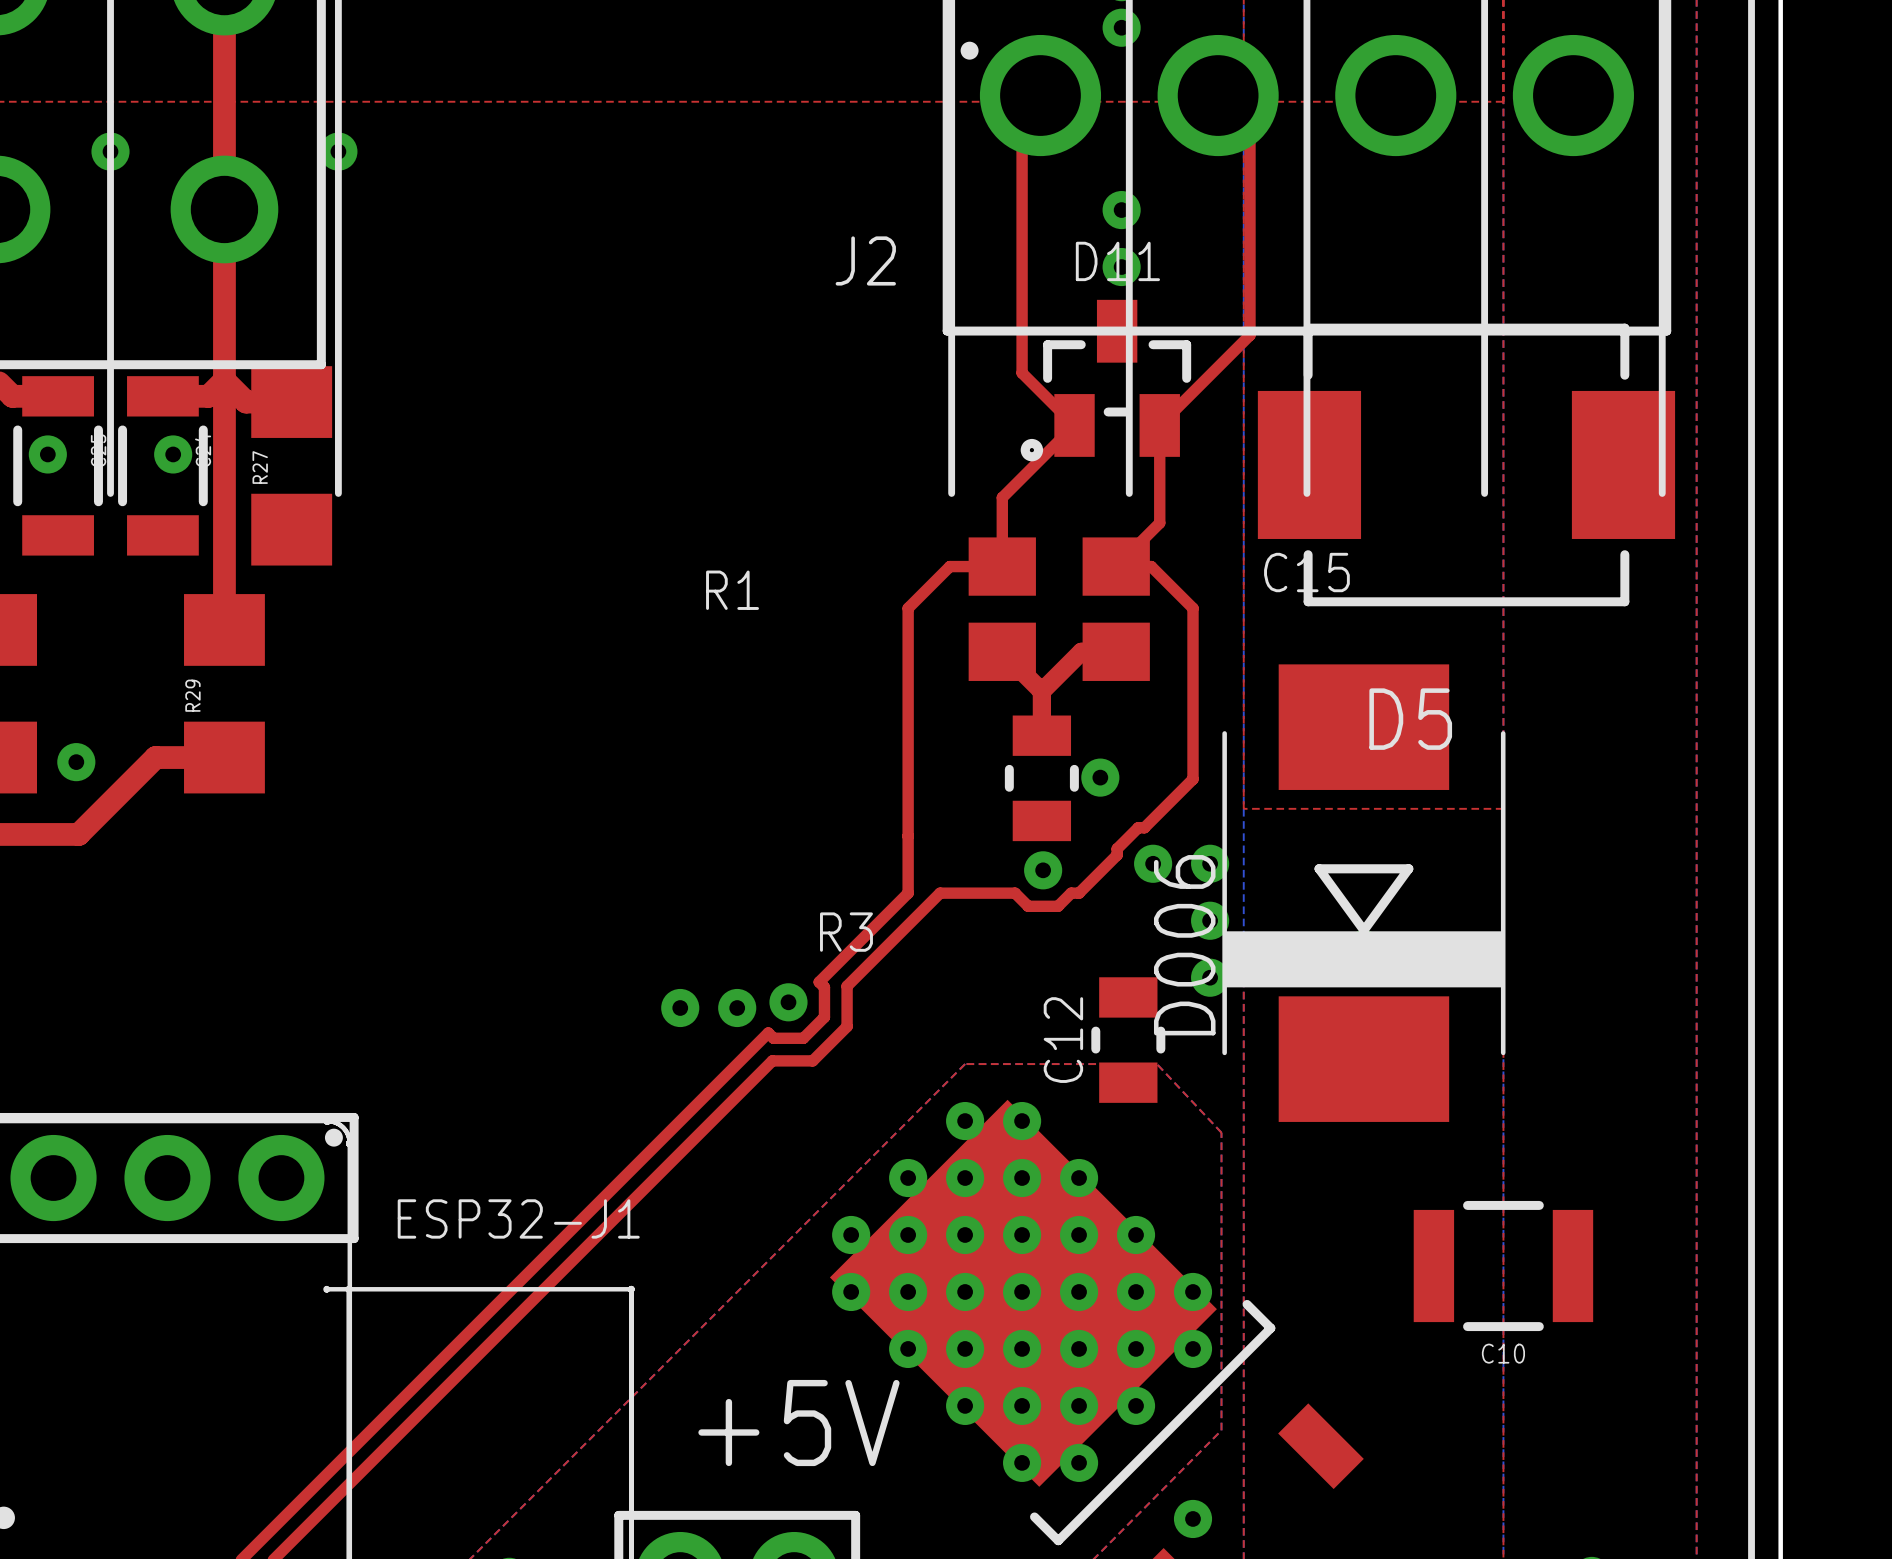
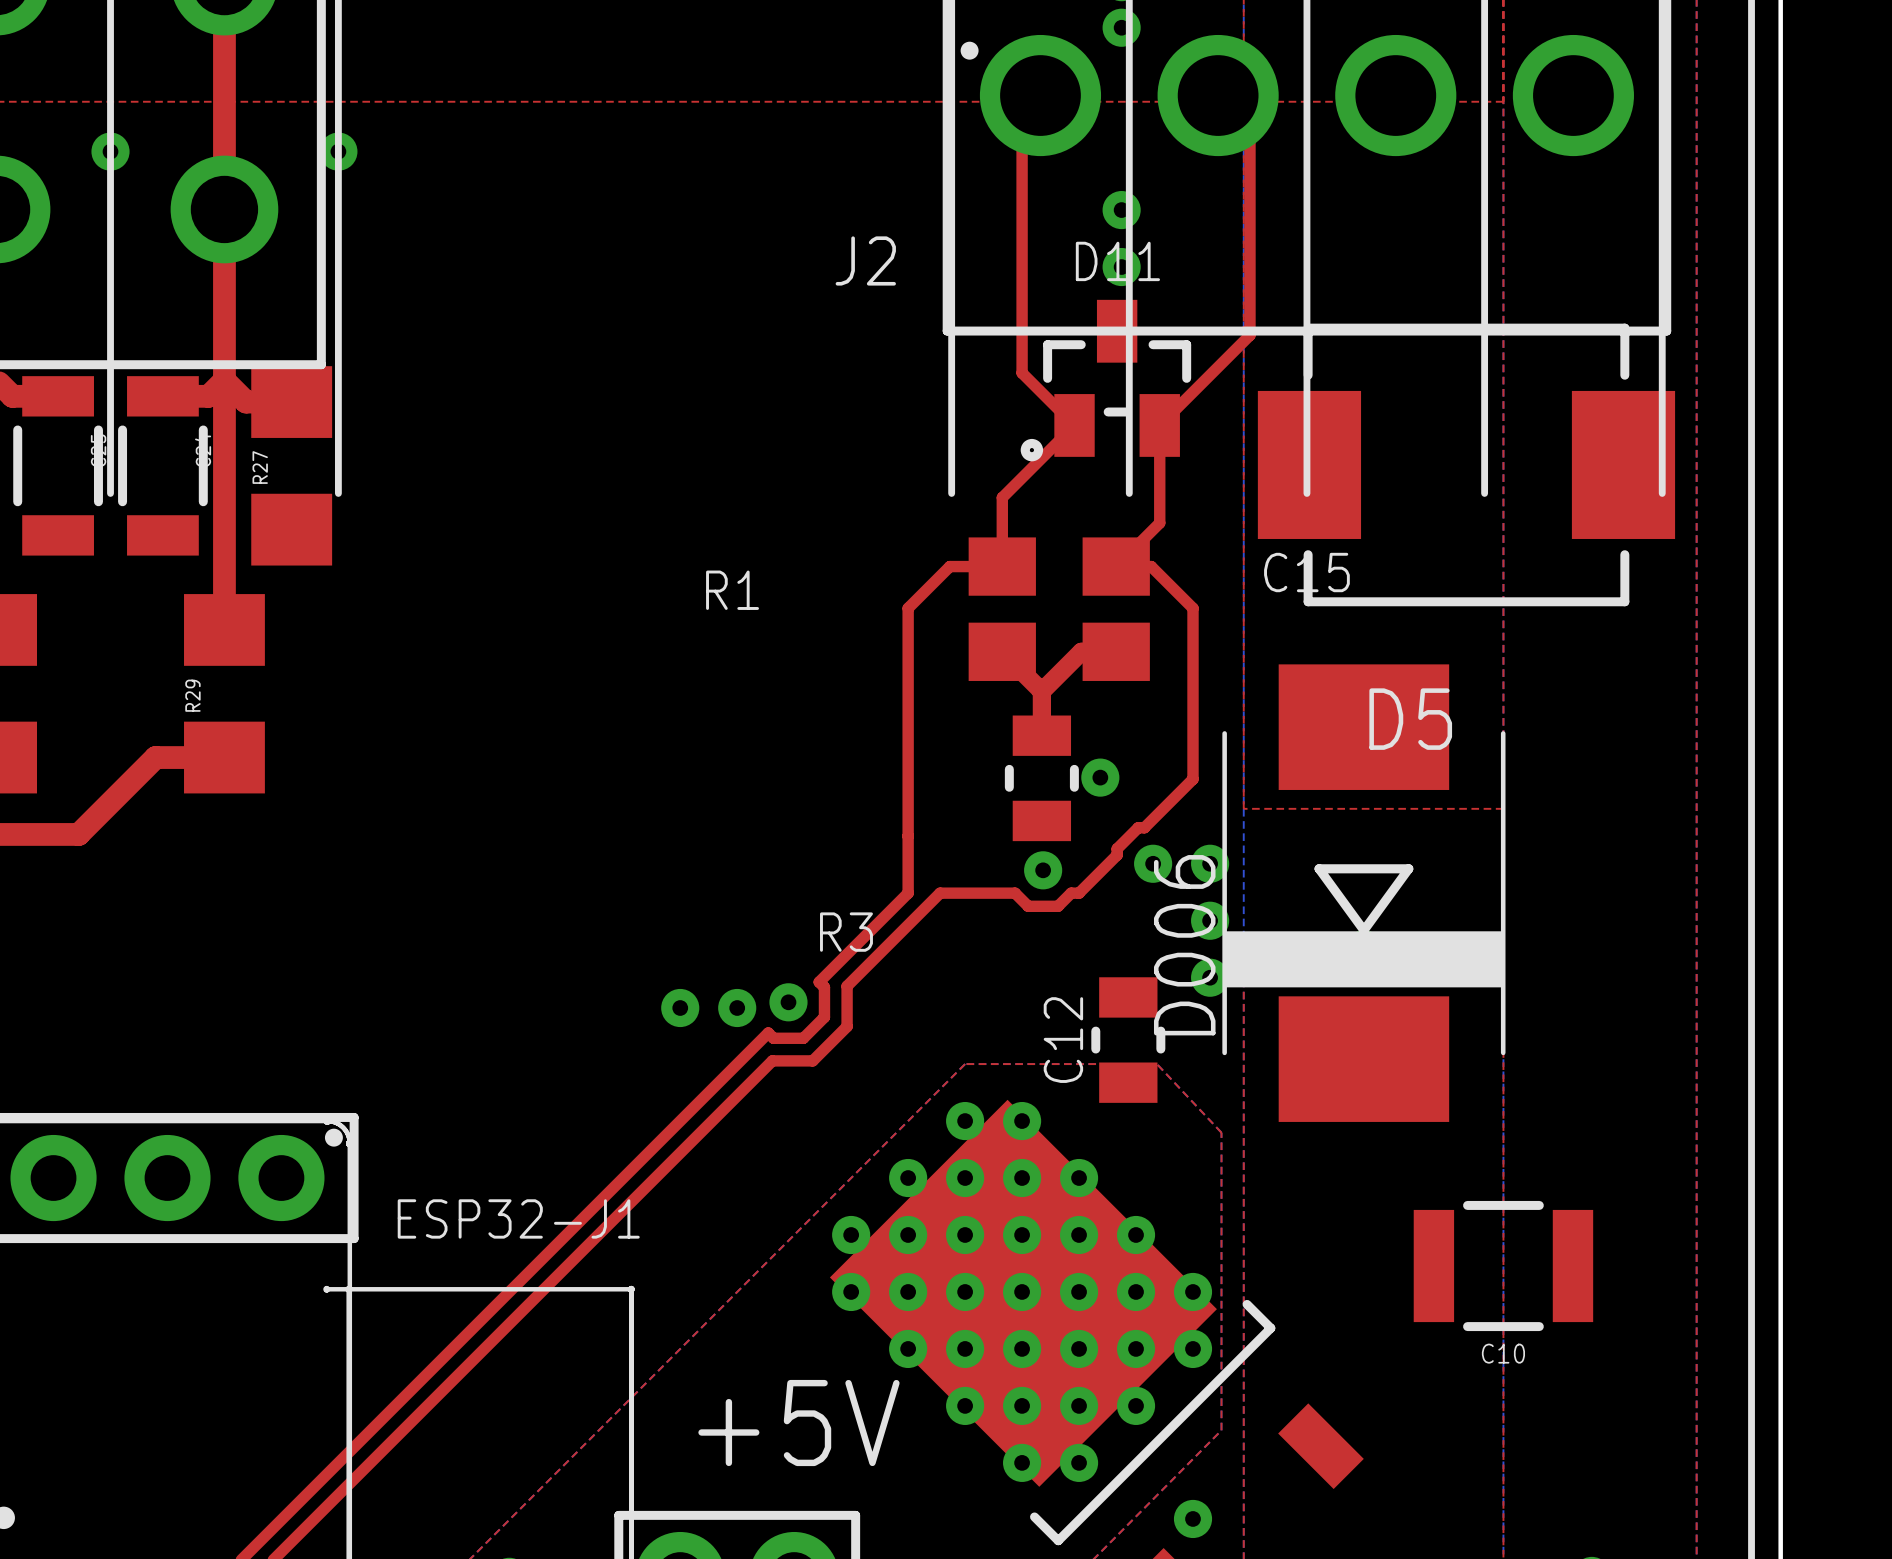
via: (47, 454) -> none
via: (173, 454) -> none
via: (76, 762) -> none

